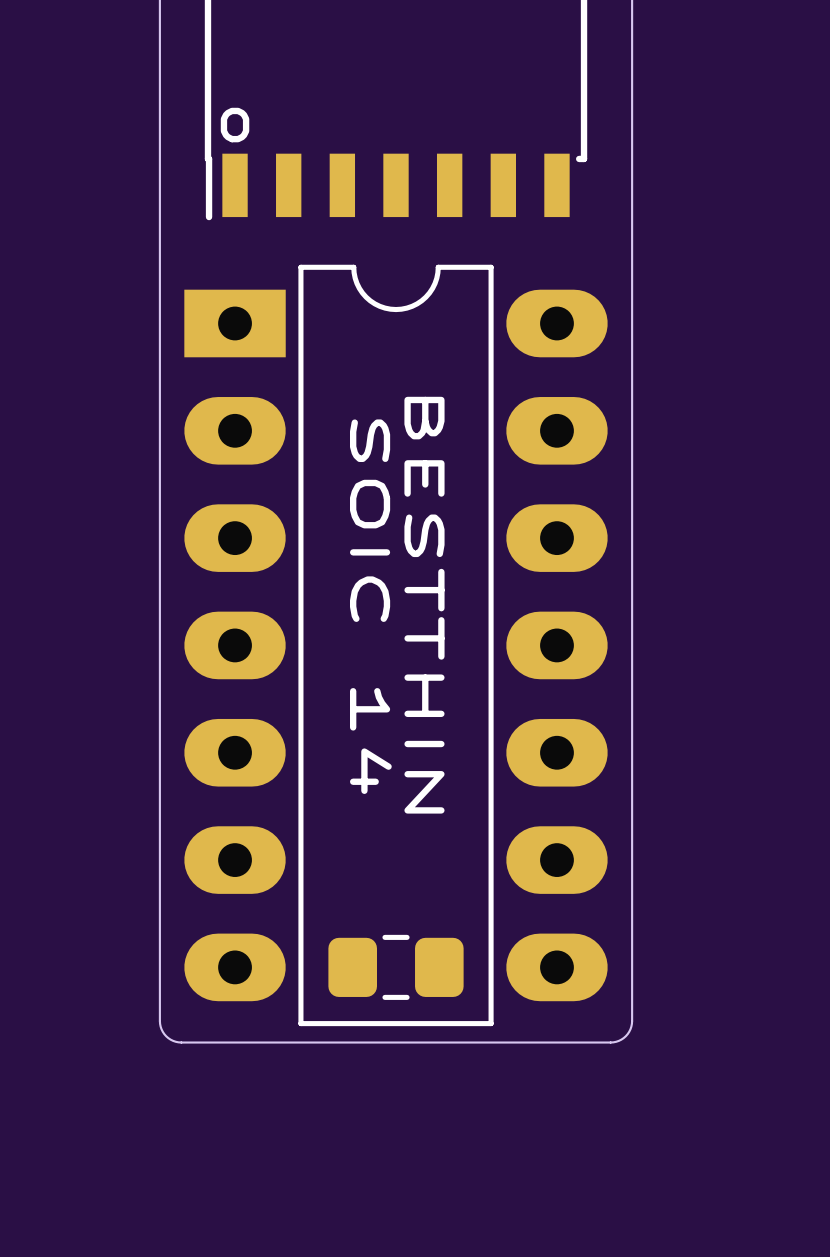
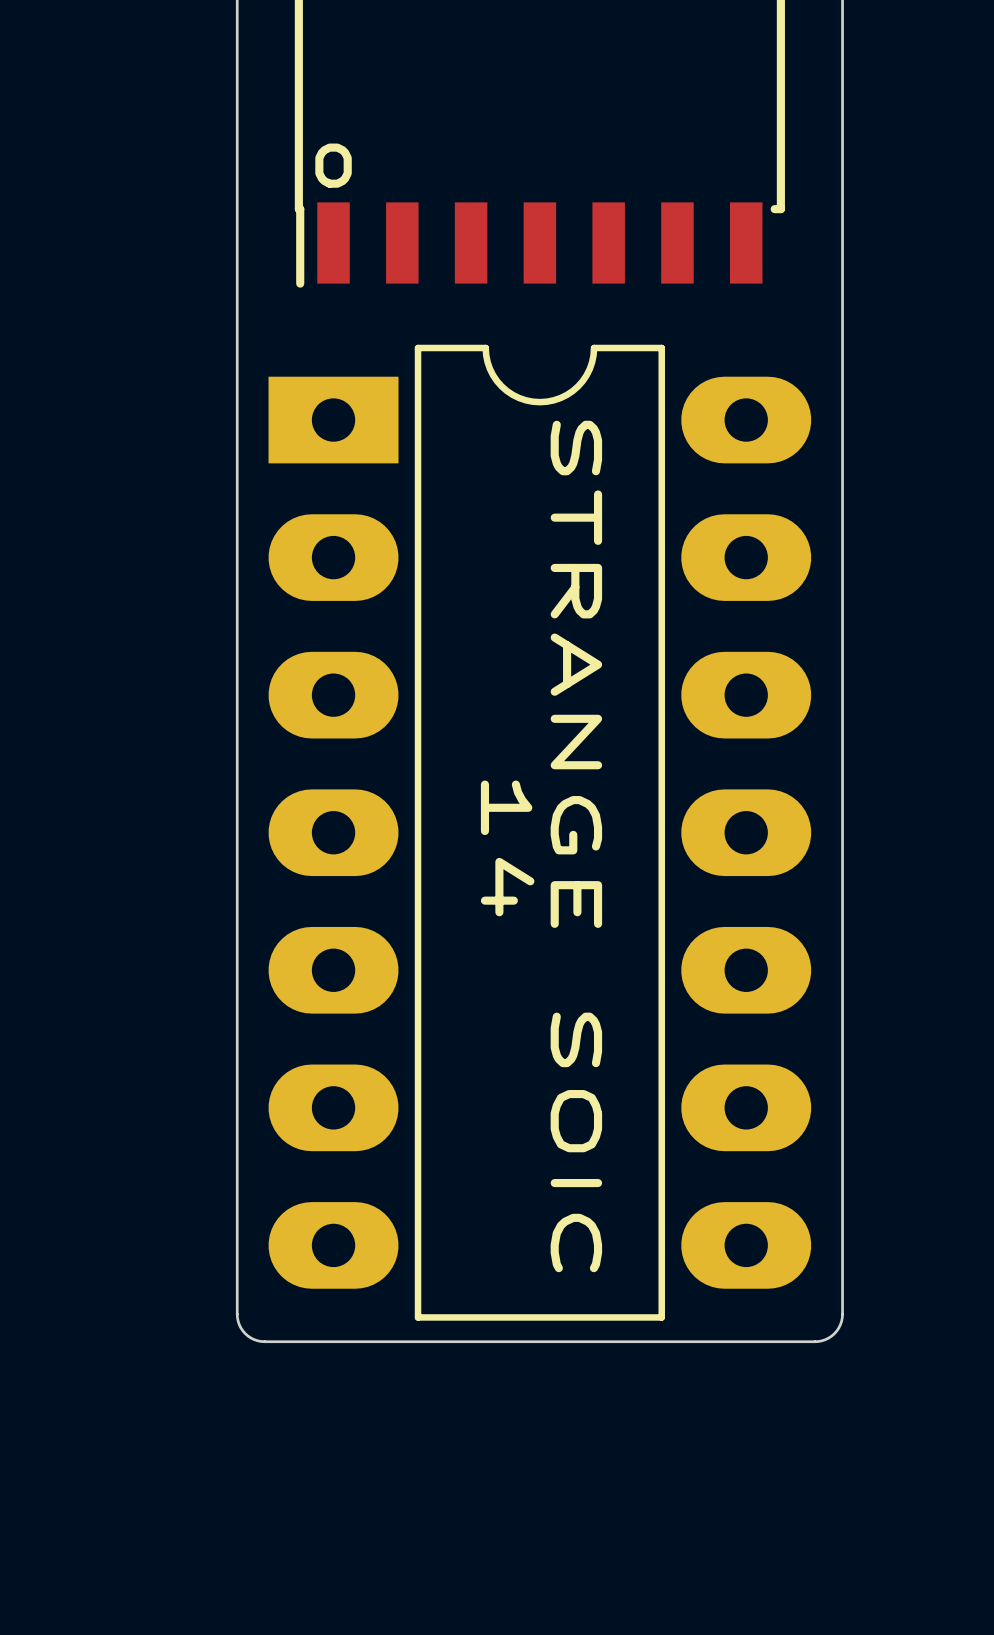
text: BESTTHIN (424, 605) -> none
text: SOIC 14 (370, 606) -> none
text: none -> STRANGE SOIC (576, 846)
text: none -> 14 (507, 848)
part: (396, 967) -> none

